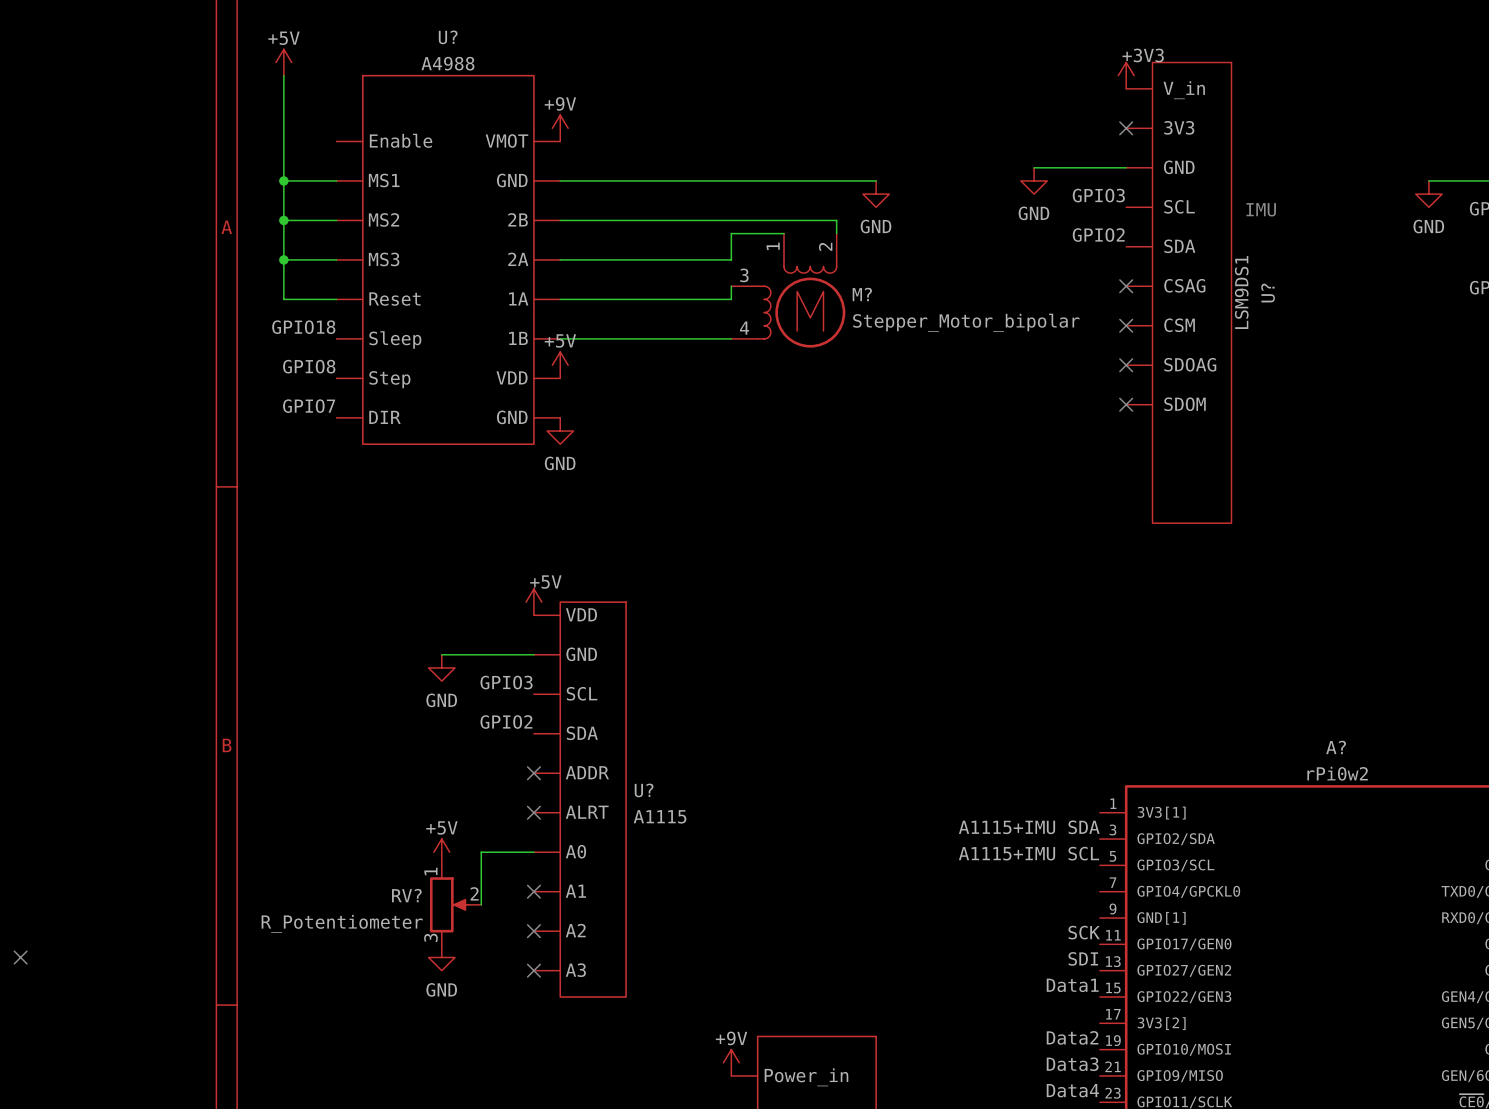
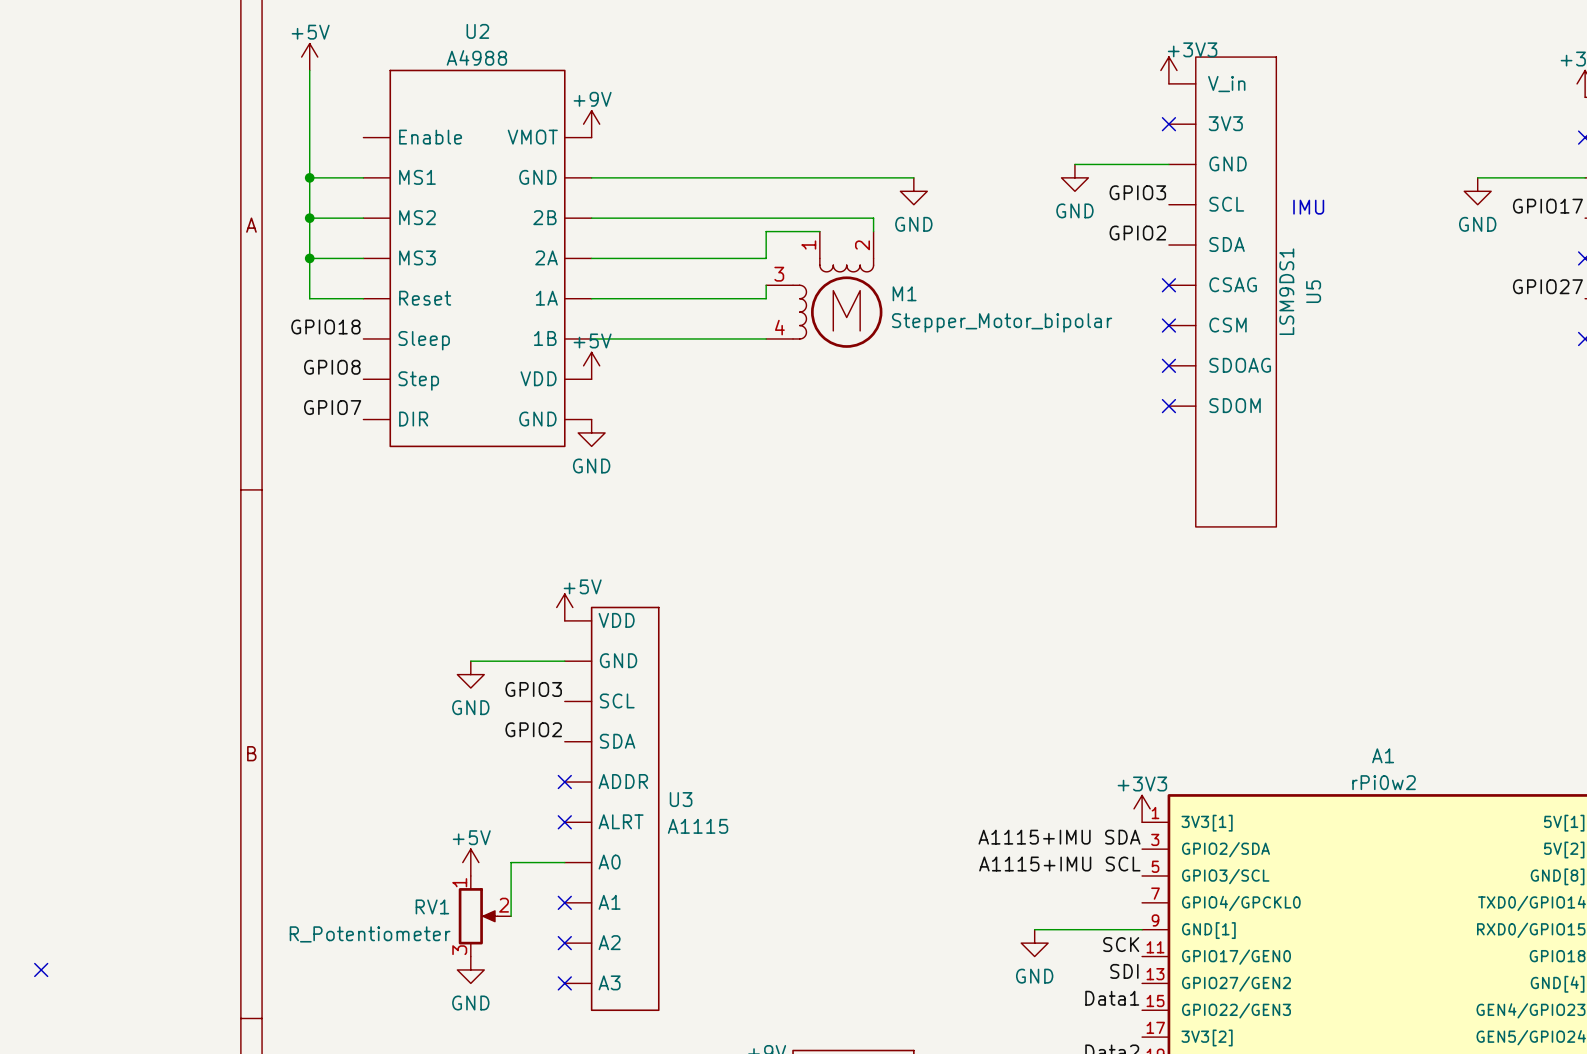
U? name: U? (448, 37) -> U2 (477, 31)
U? name: U? (1268, 293) -> U5 (1313, 291)
M? name: M? (862, 294) -> M1 (904, 293)
A? name: A? (1336, 747) -> A1 (1383, 755)
U? name: U? (644, 790) -> U3 (681, 799)
power symbol: none -> +3V3 (1142, 808)
RV? name: RV? (406, 895) -> RV1 (432, 906)
wire: none -> (1034, 929) (1142, 929)
power symbol: none -> GND (1034, 943)

